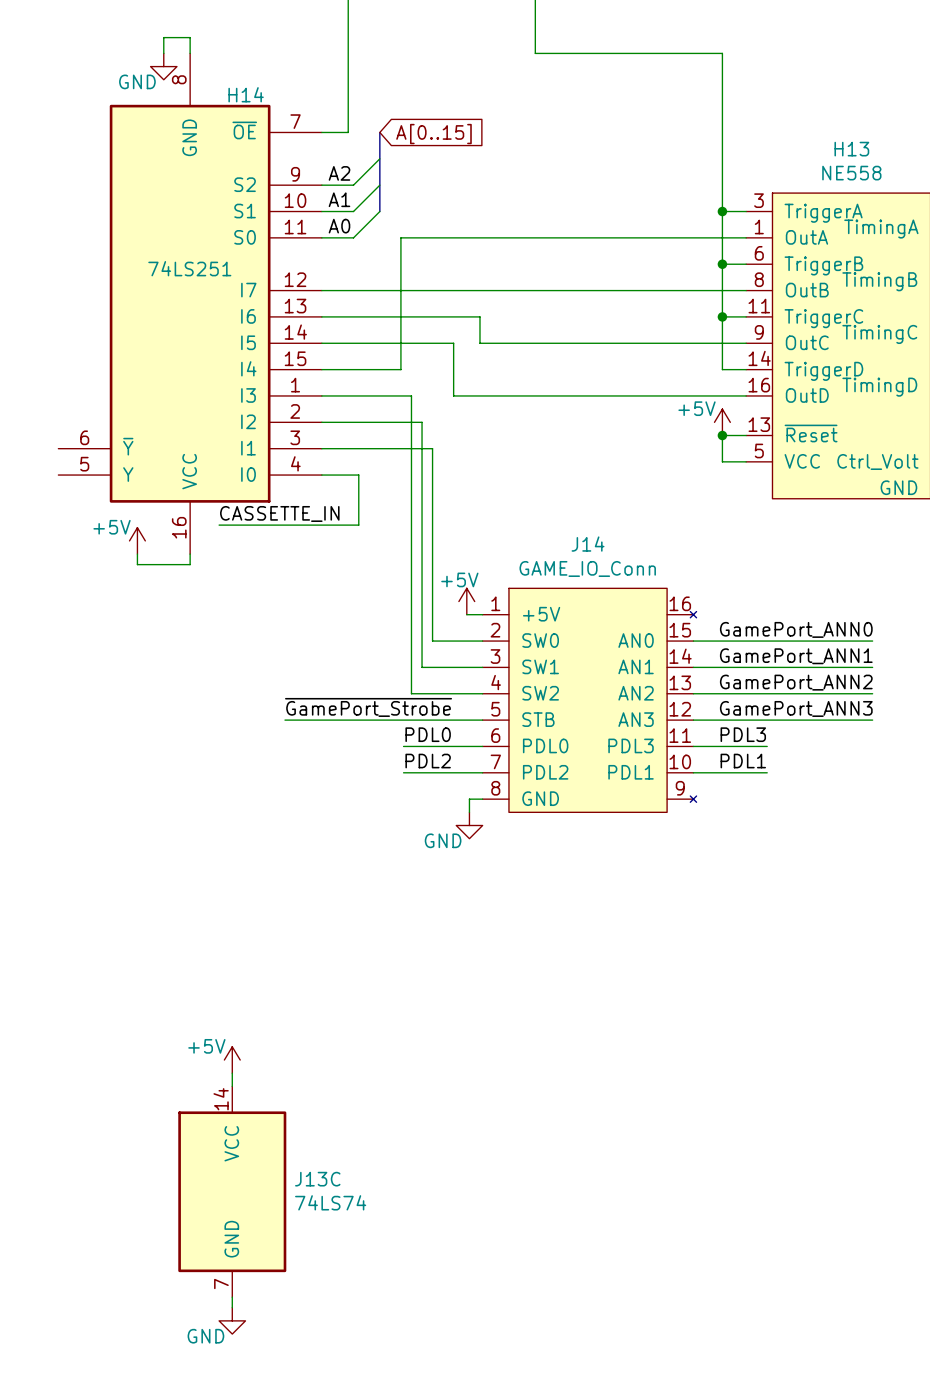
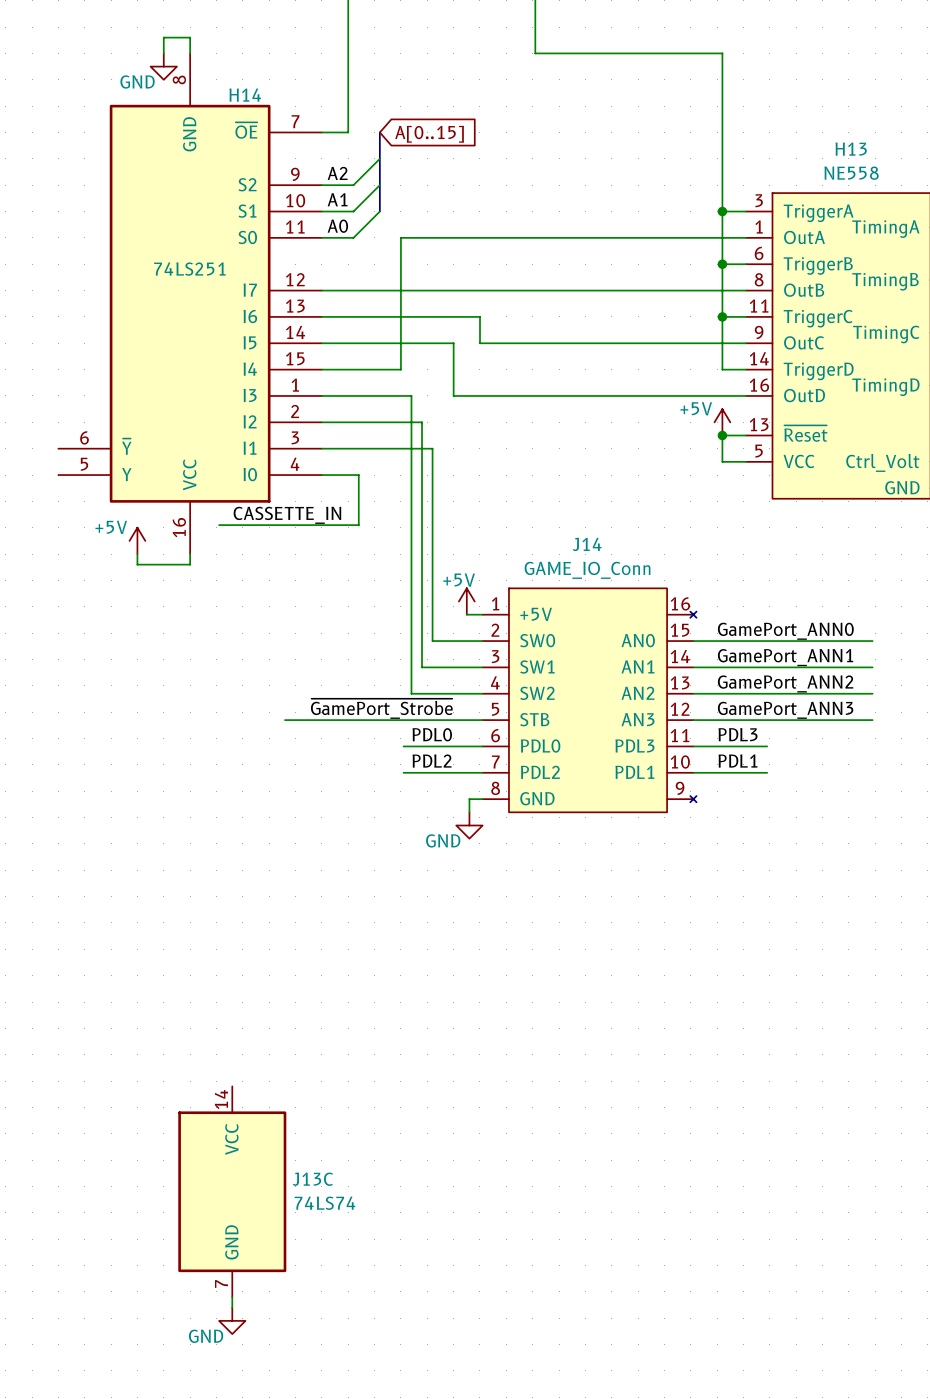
power symbol: +5V (232, 1060) -> none
wire: (232, 1073) (232, 1086) -> none

